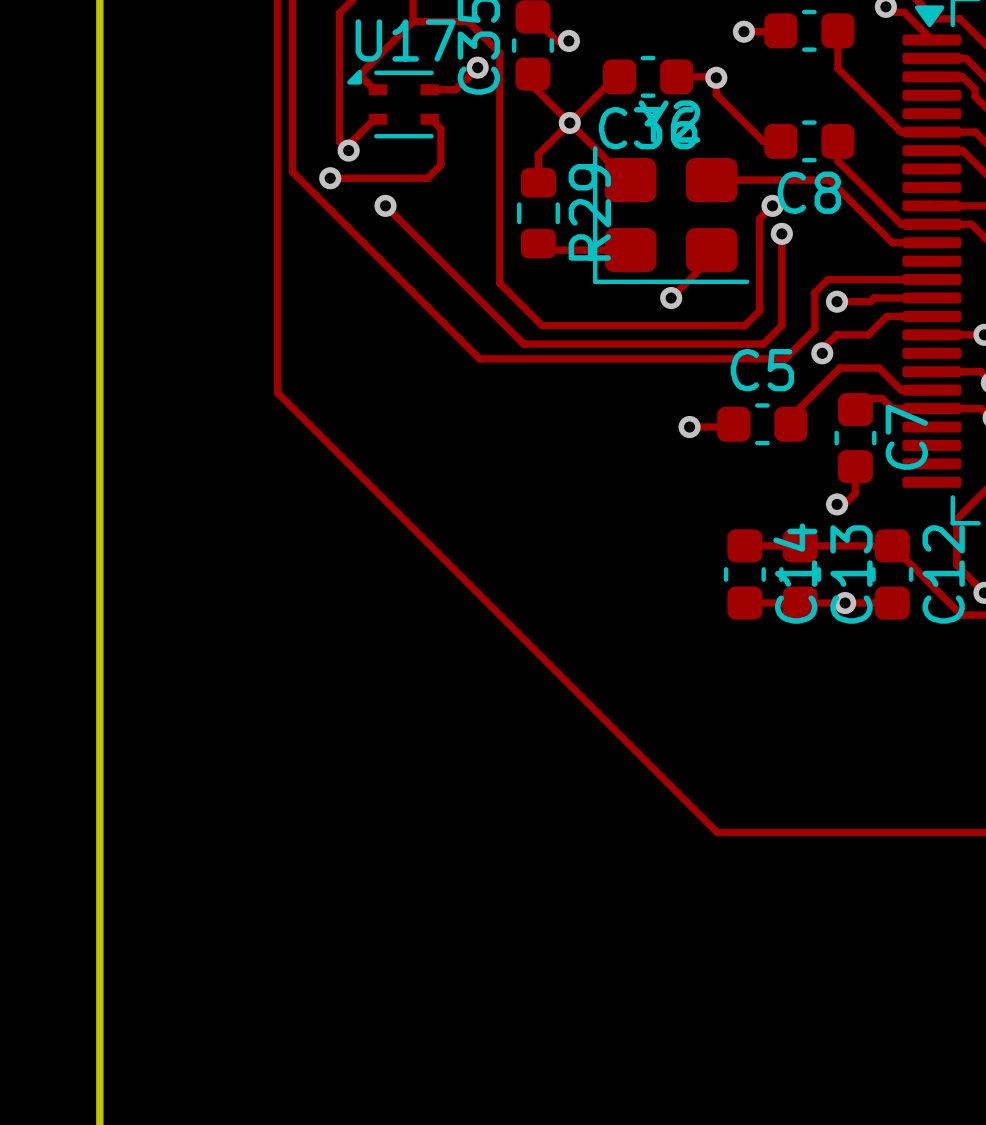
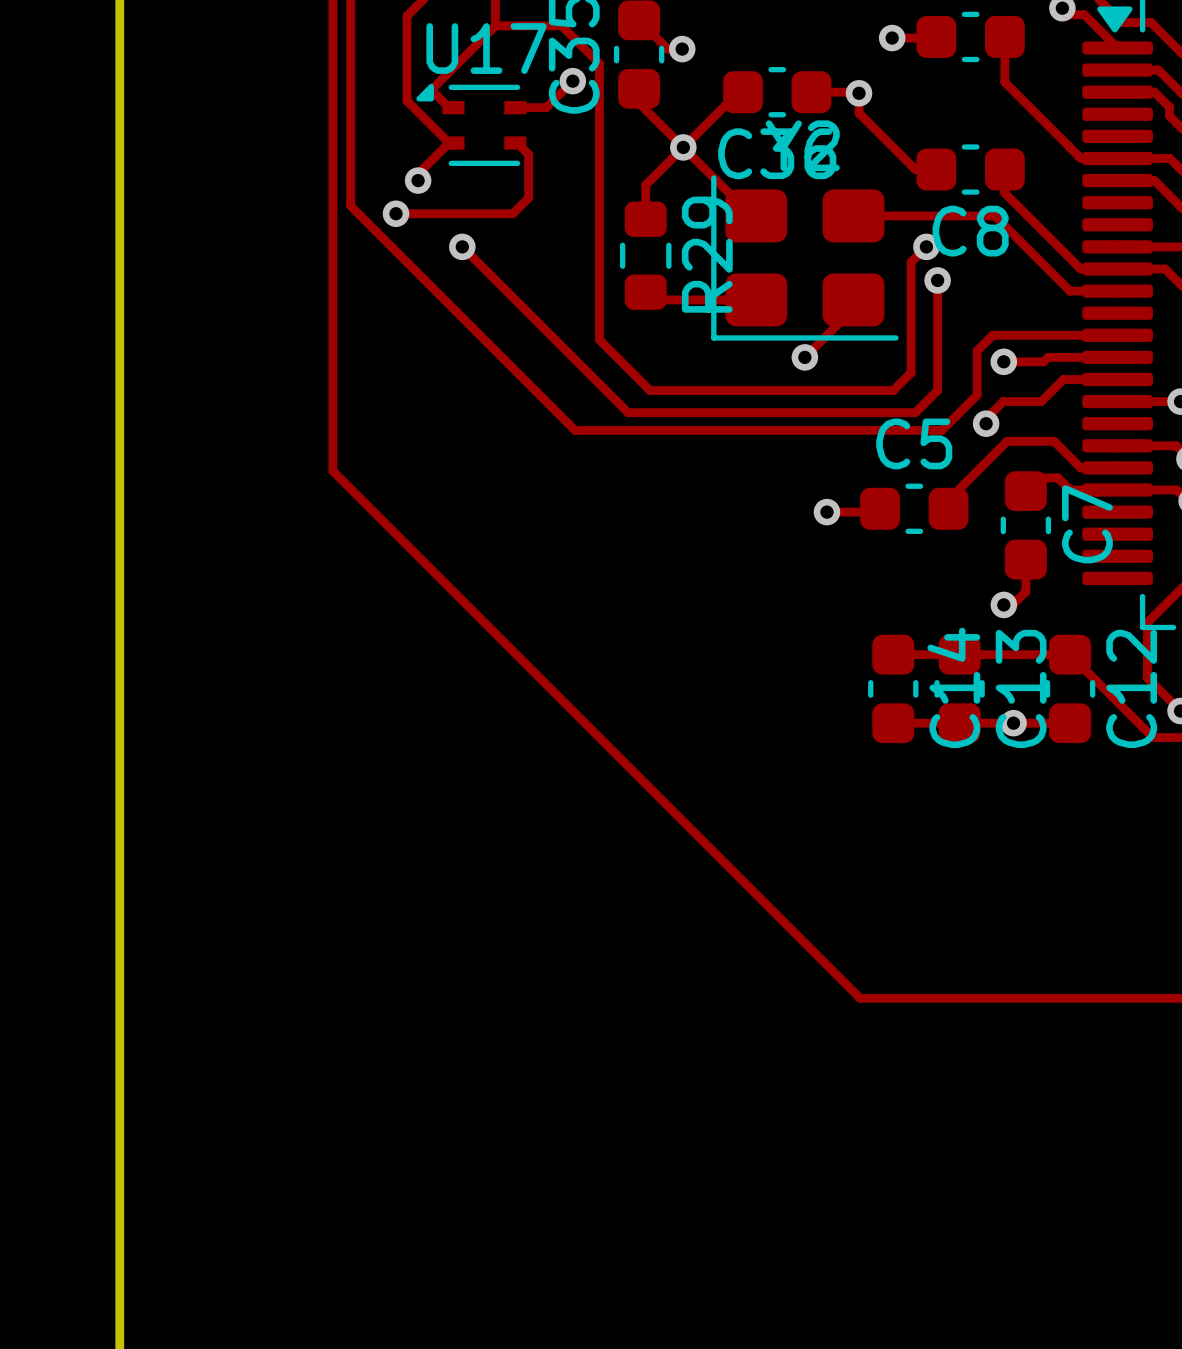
track: (339, 84) (339, 141) (348, 150) (356, 150) -> (407, 101) (449, 143)

